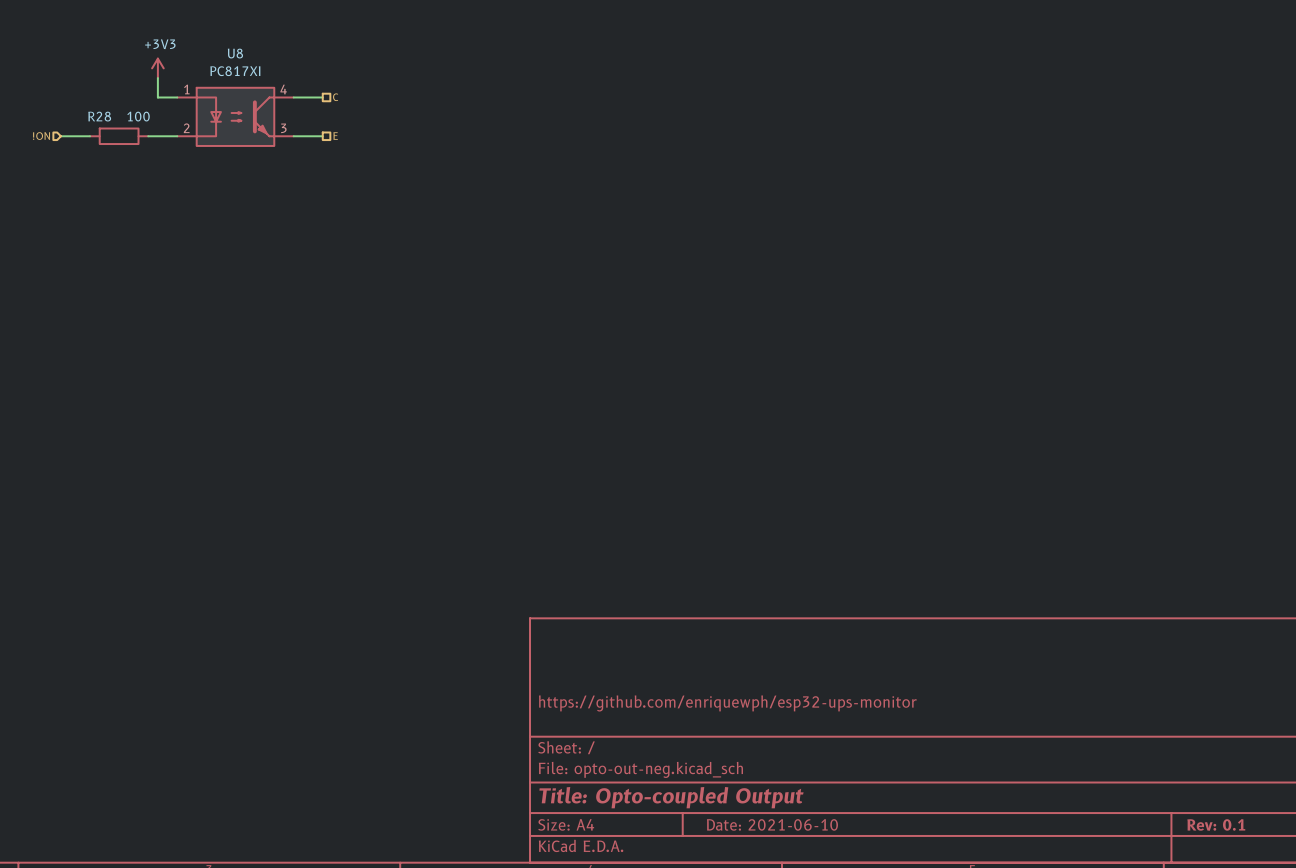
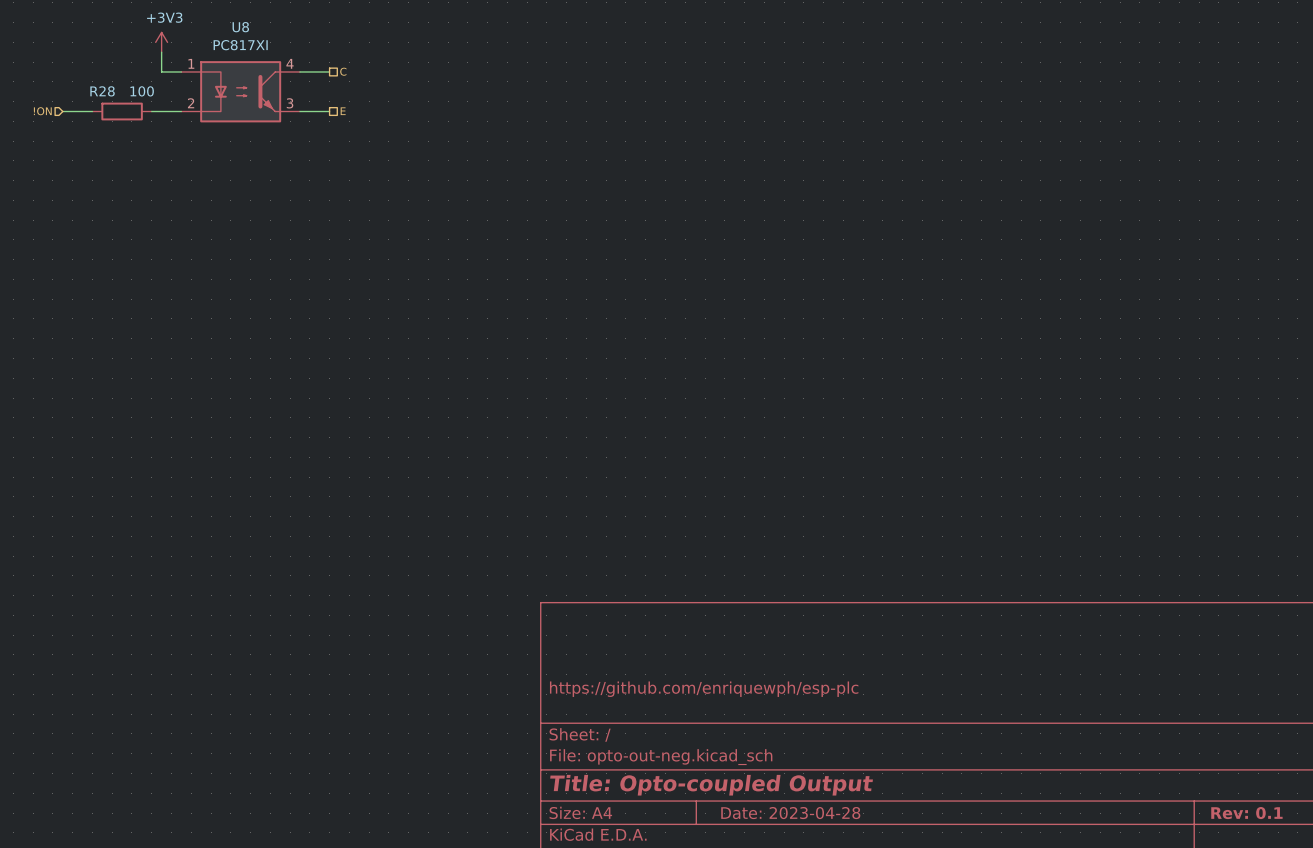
title block: https://github.com/enriquewph/esp32-ups-monitor (727, 703) -> https://github.com/enriquewph/esp-plc (704, 689)
title block: Date: 2021-06-10 (772, 824) -> Date: 2023-04-28 (790, 813)

